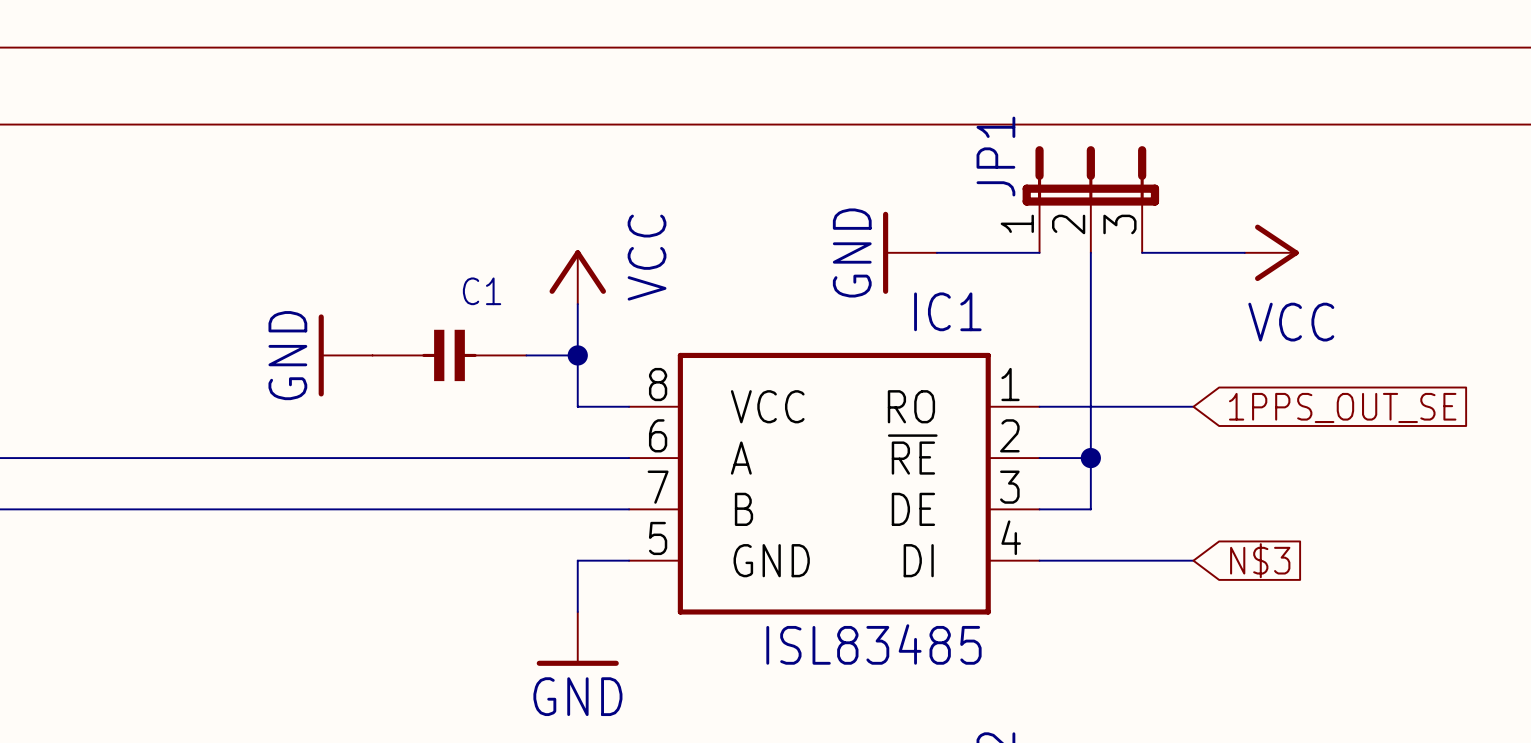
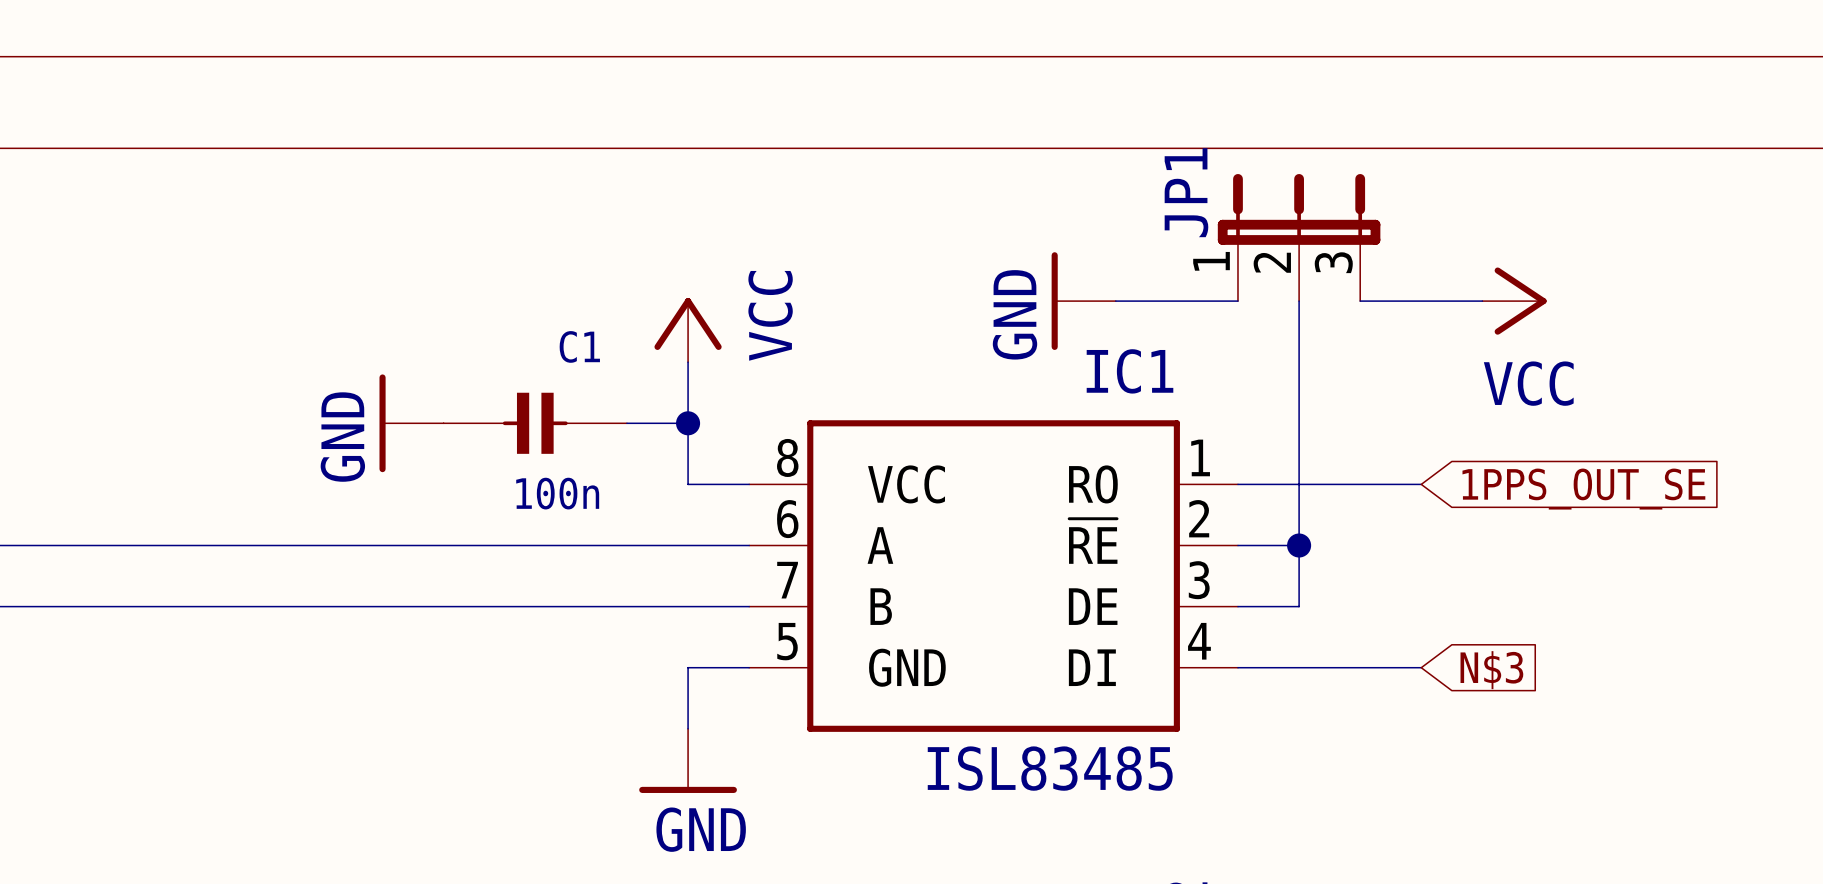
C1 value: none -> 100n (557, 493)

